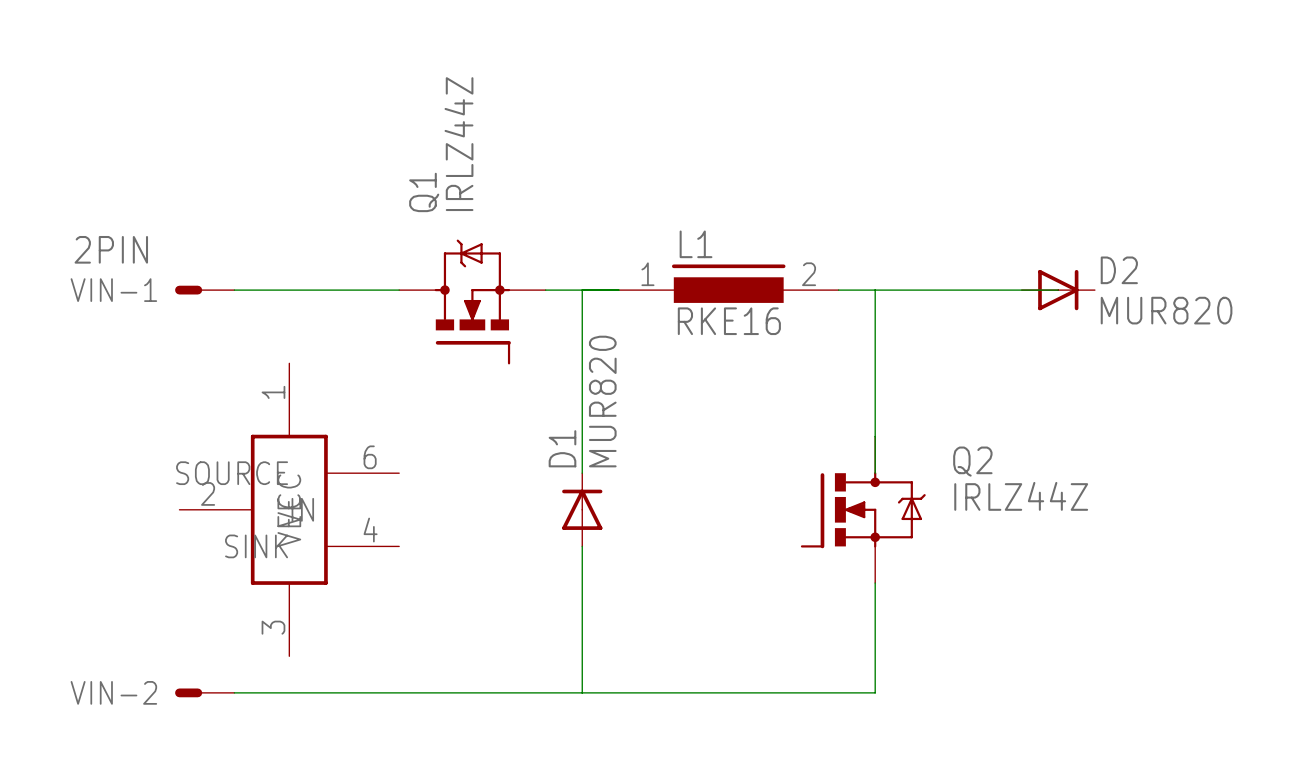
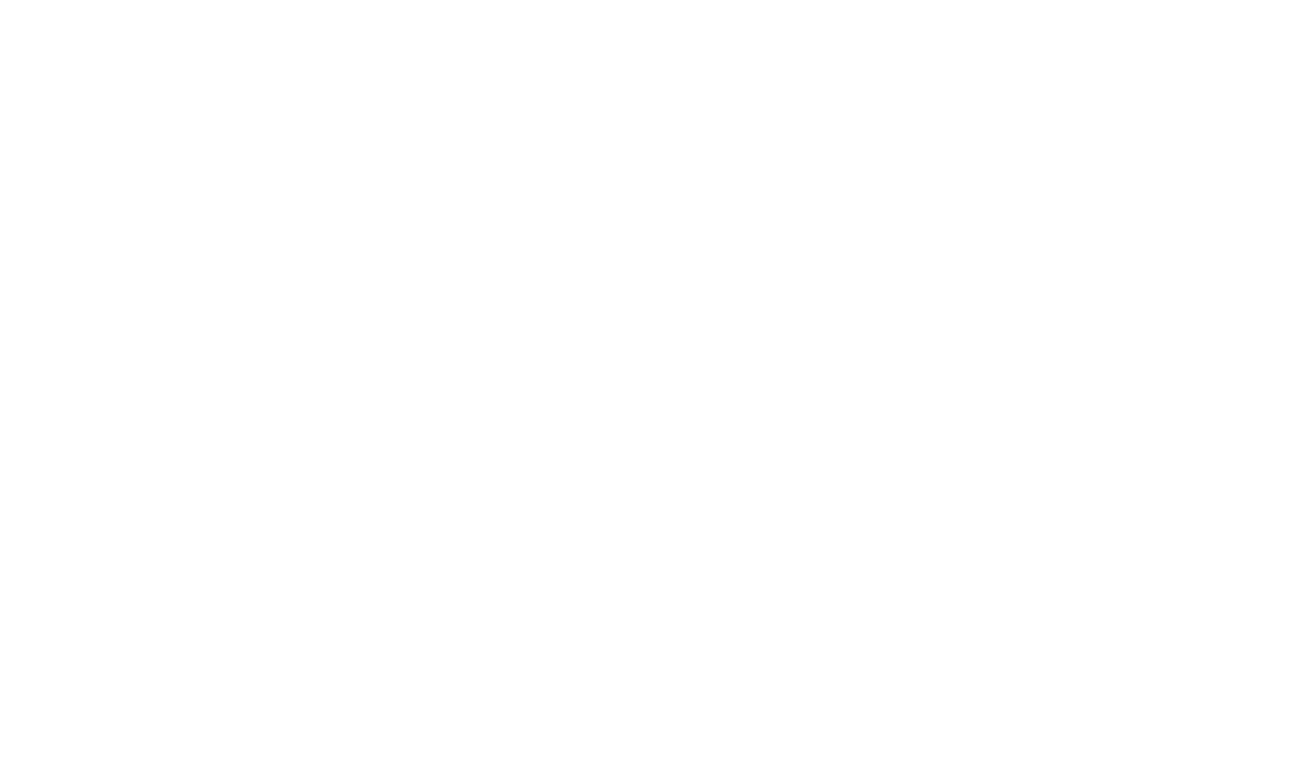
L1: RKE16 (728, 283) -> none
VIN-1: 2PIN (204, 290) -> none
wire: (234, 290) (399, 290) -> none
wire: (545, 290) (618, 290) -> none
wire: (582, 290) (582, 473) -> none
wire: (838, 290) (1058, 290) -> none
wire: (875, 290) (875, 473) -> none
D2: MUR820 (1058, 290) -> none
Q1: IRLZ44Z (472, 302) -> none
part: (289, 509) -> none
D1: MUR820 (582, 509) -> none
Q2: IRLZ44Z (863, 509) -> none
wire: (582, 546) (582, 692) -> none
wire: (875, 583) (875, 692) (234, 692) -> none
VIN-2: (204, 692) -> none

